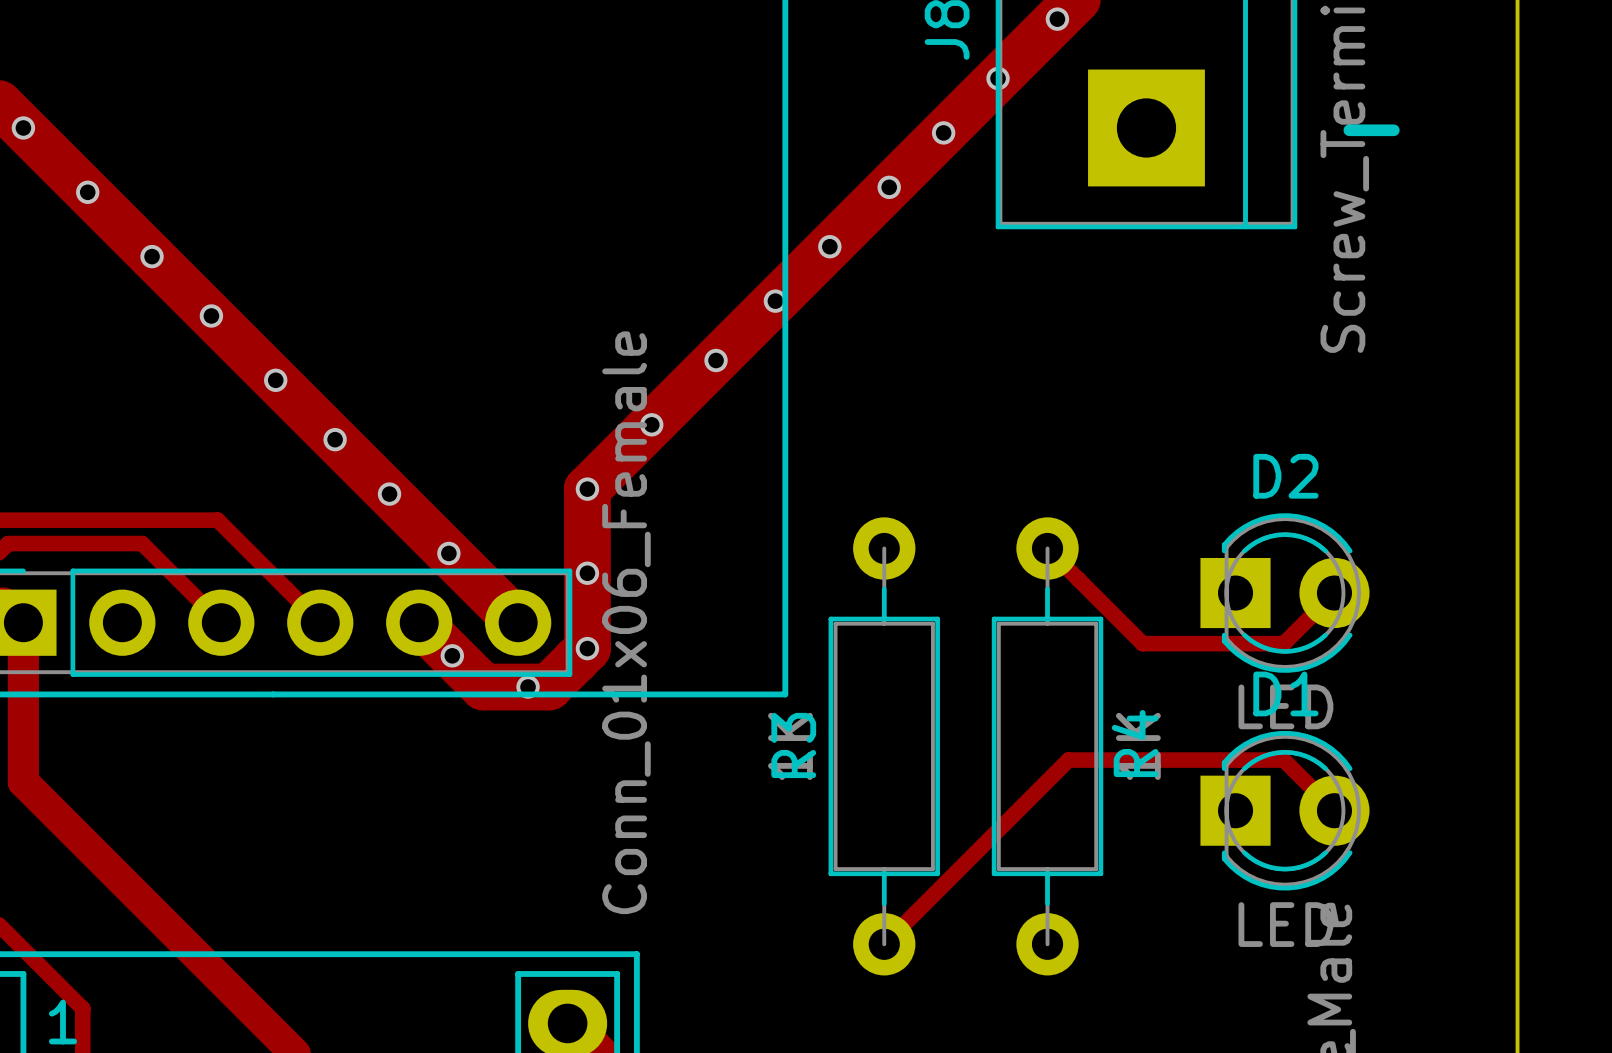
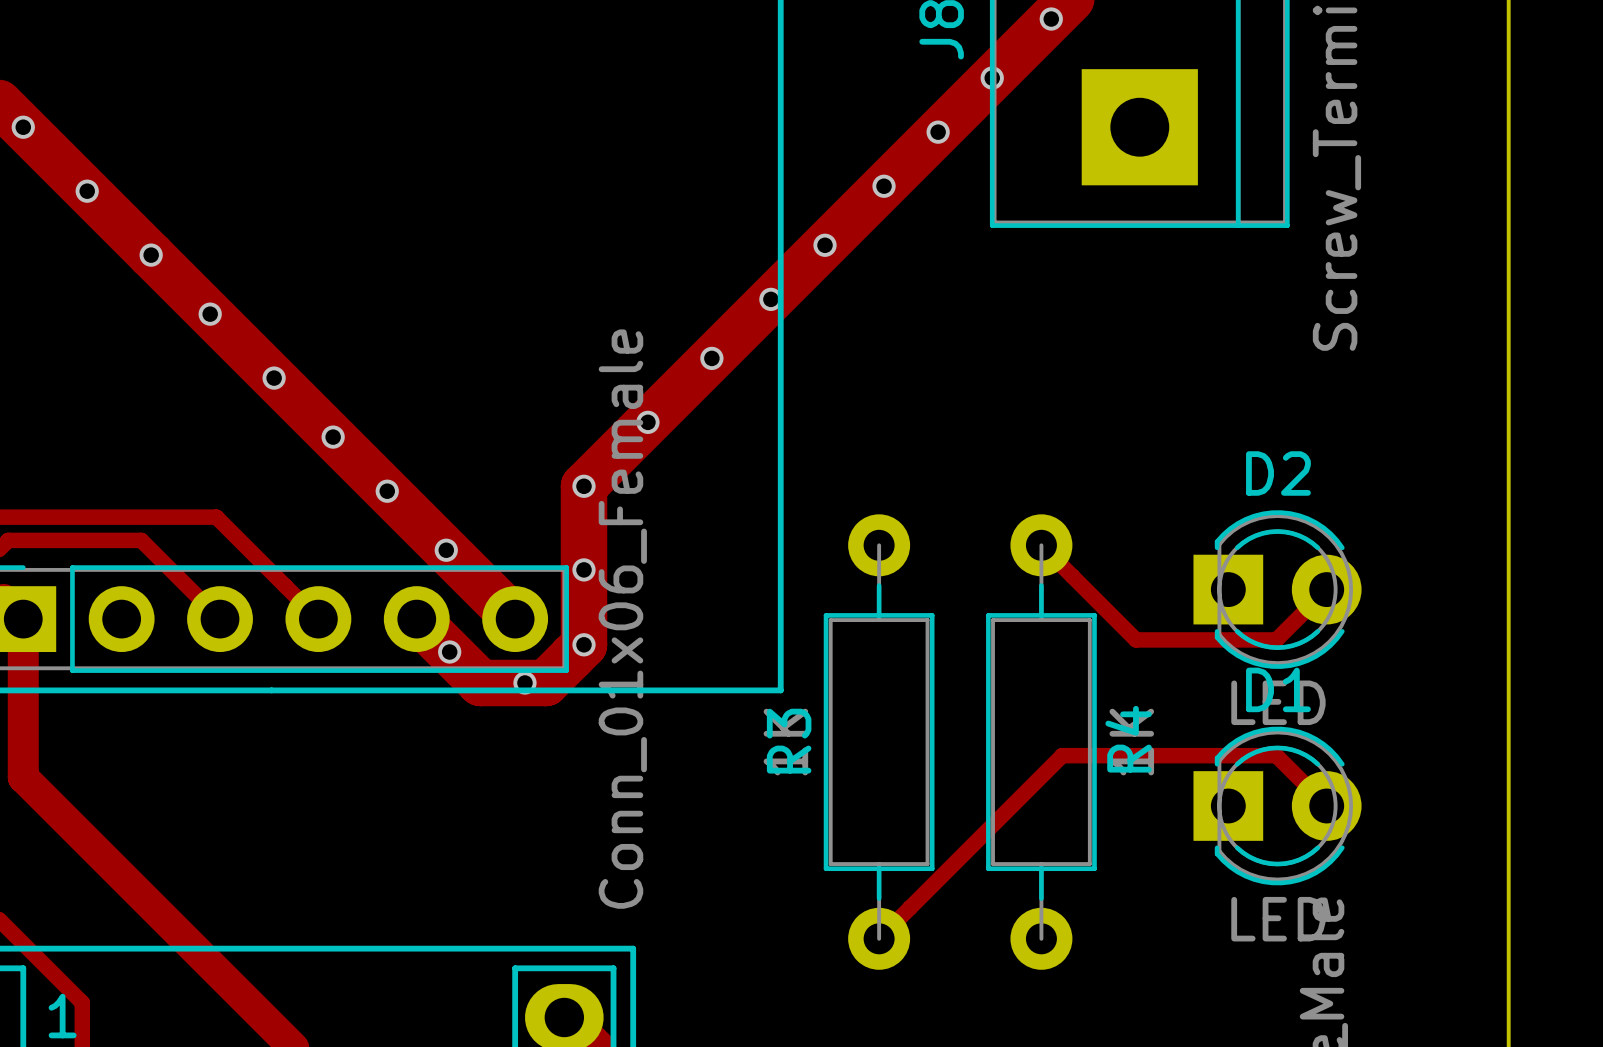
text: - (1371, 130) -> none

